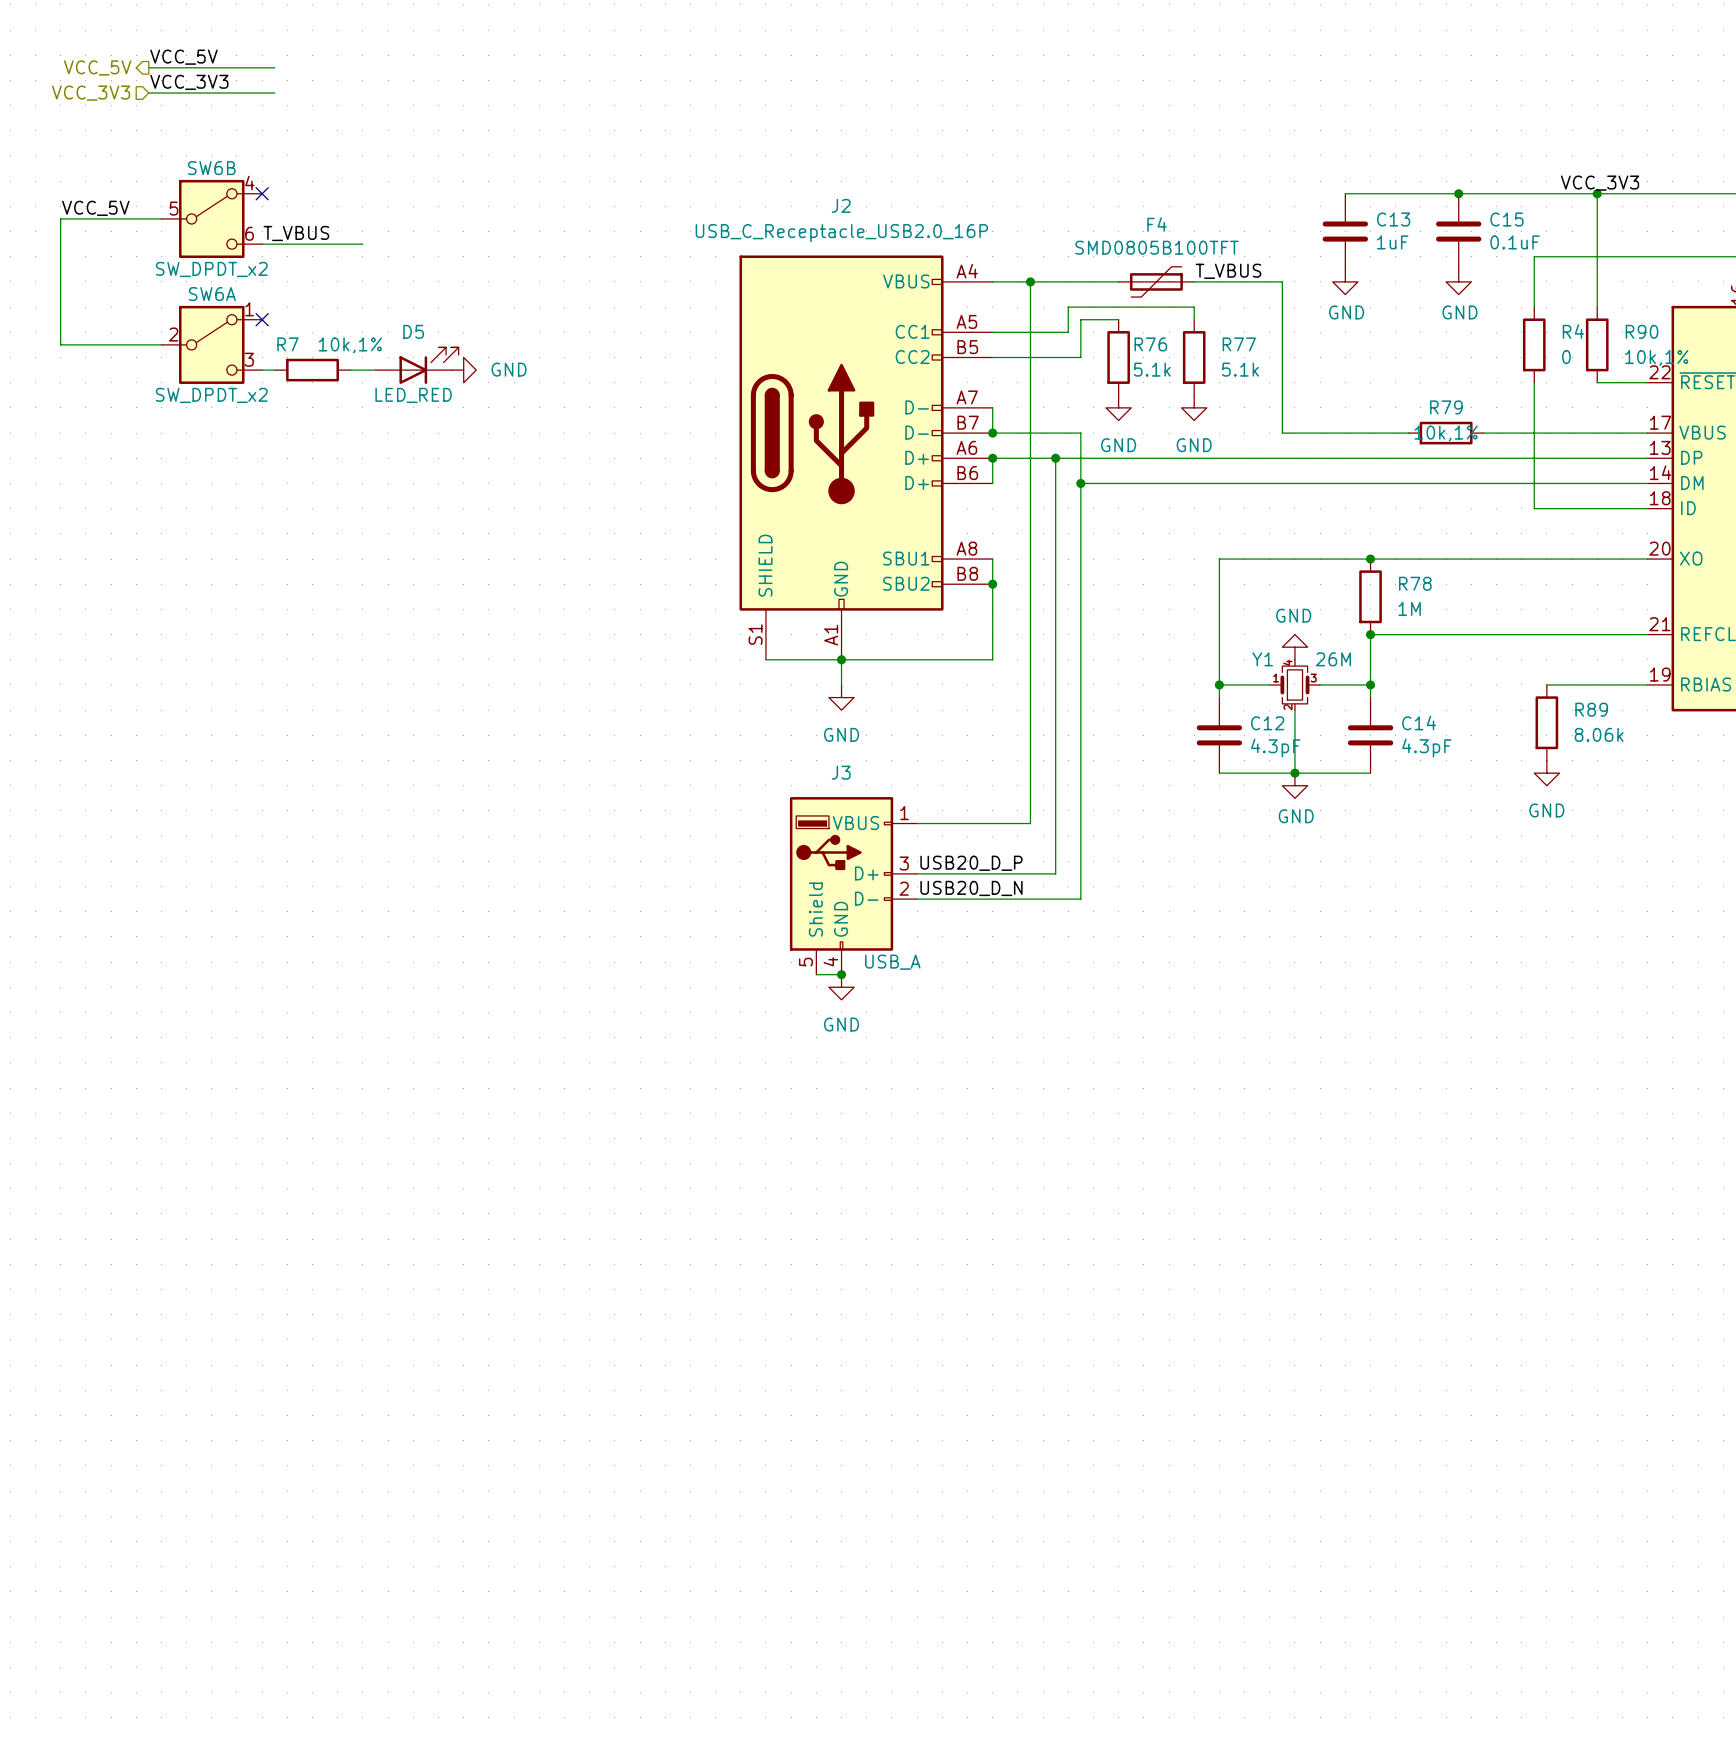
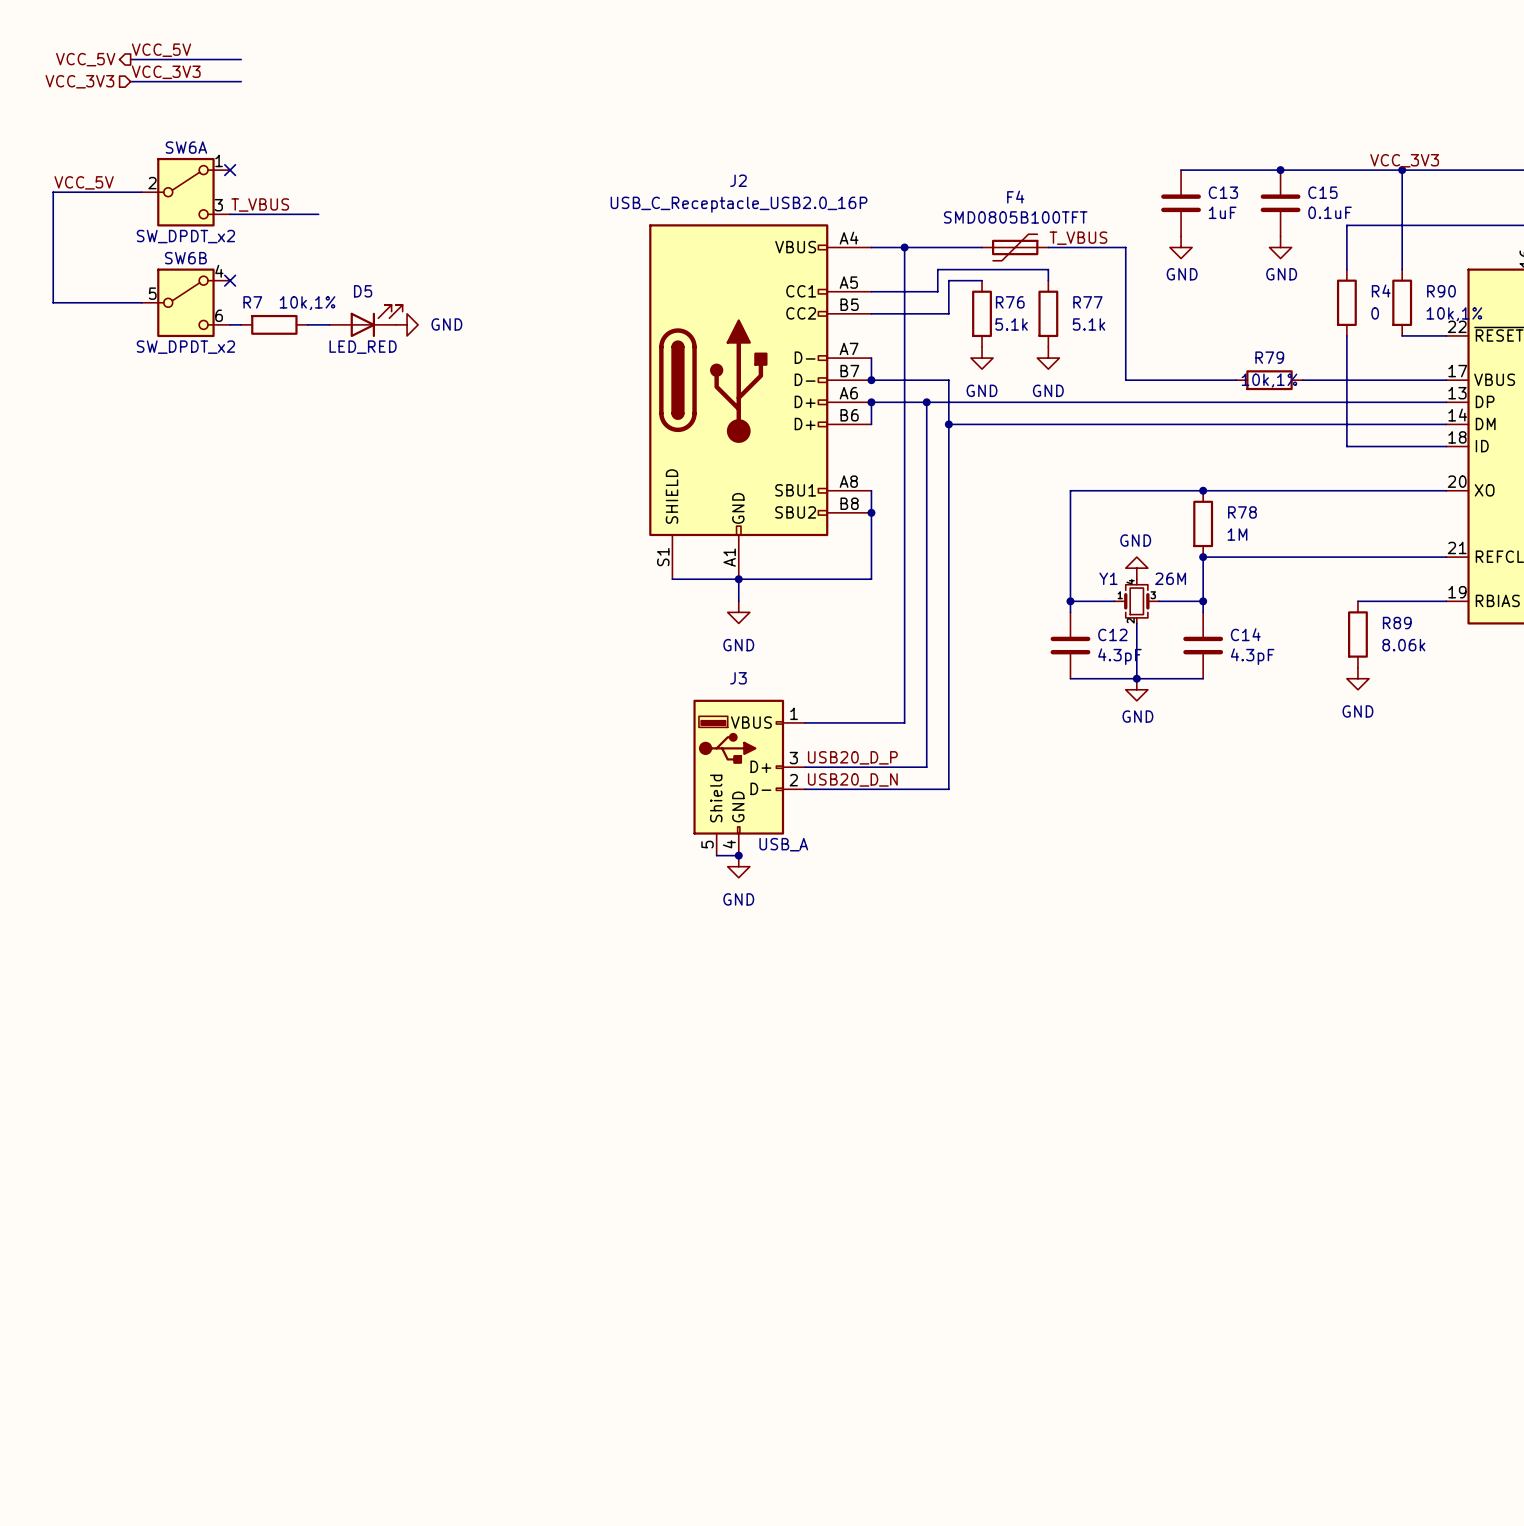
SW6B position: (211, 218) -> (185, 302)
SW6A position: (211, 344) -> (185, 192)

